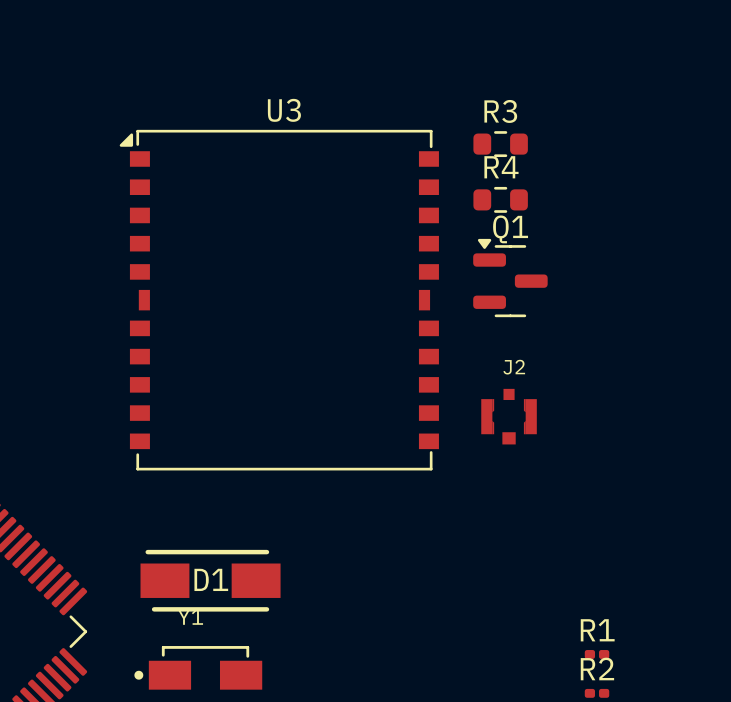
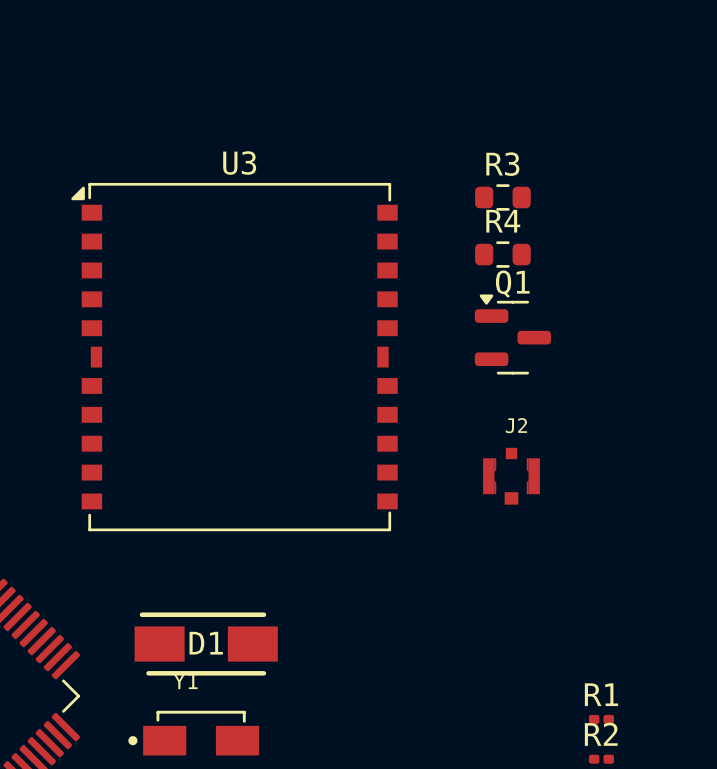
U3 position: (279, 300) -> (234, 357)

